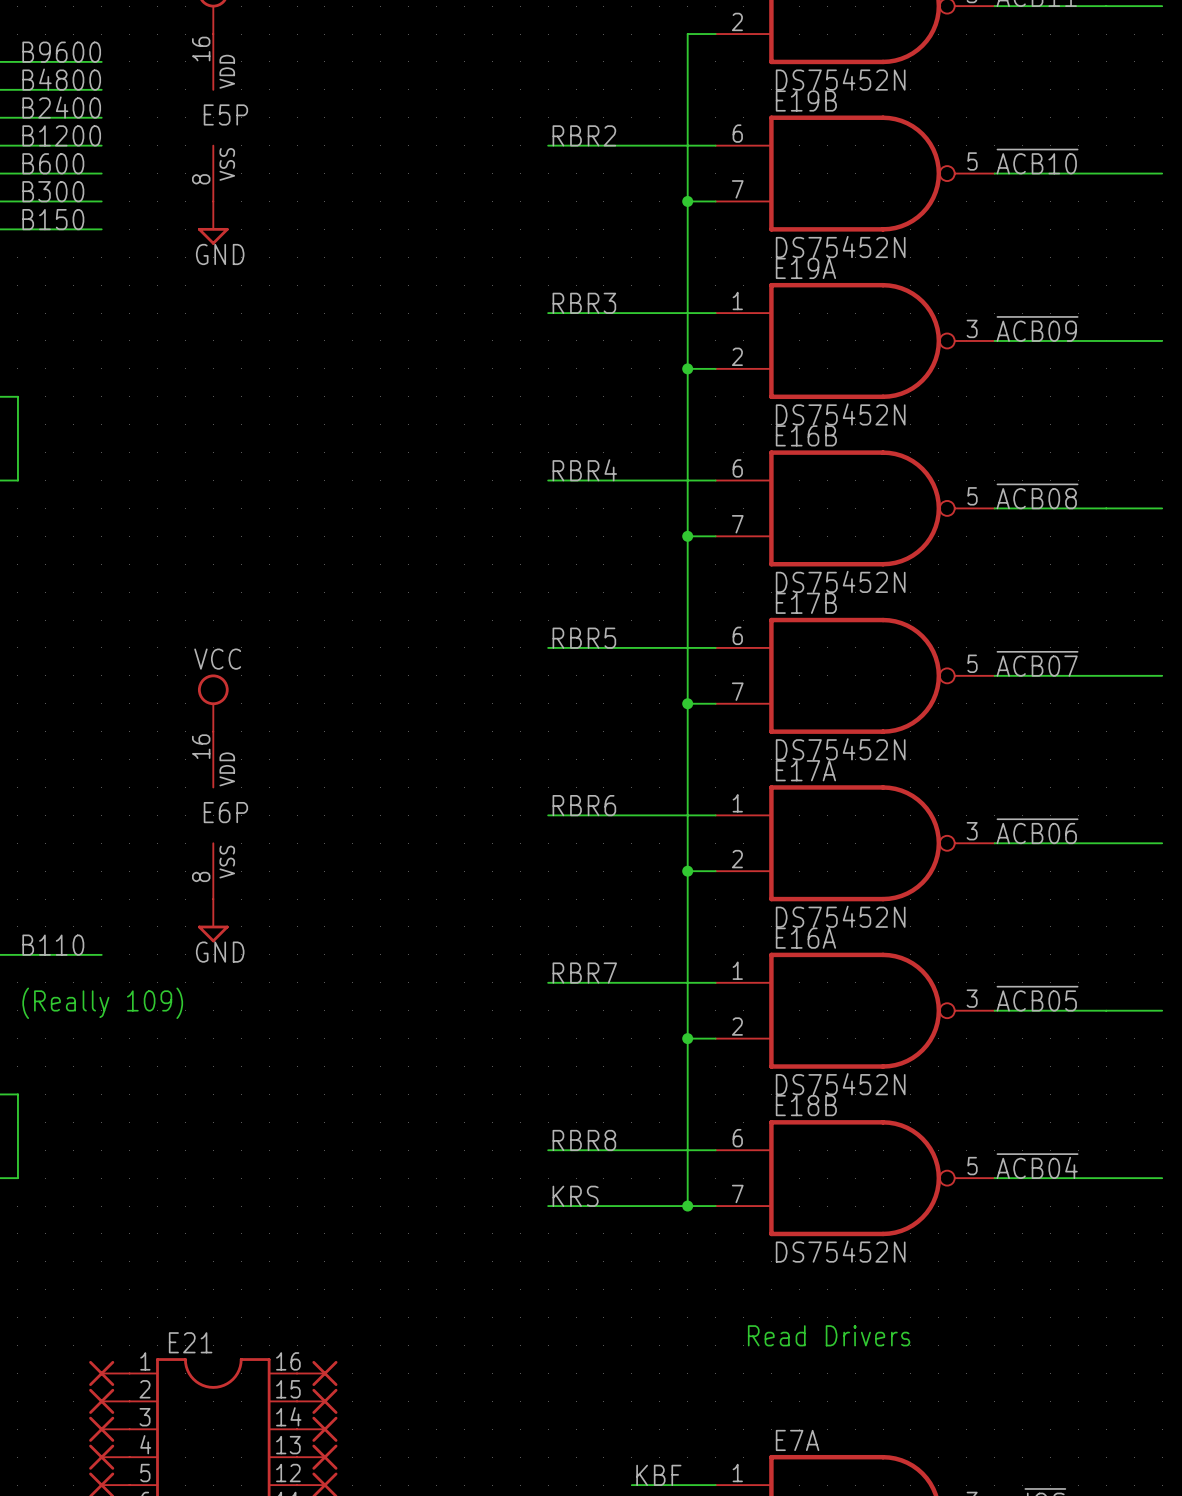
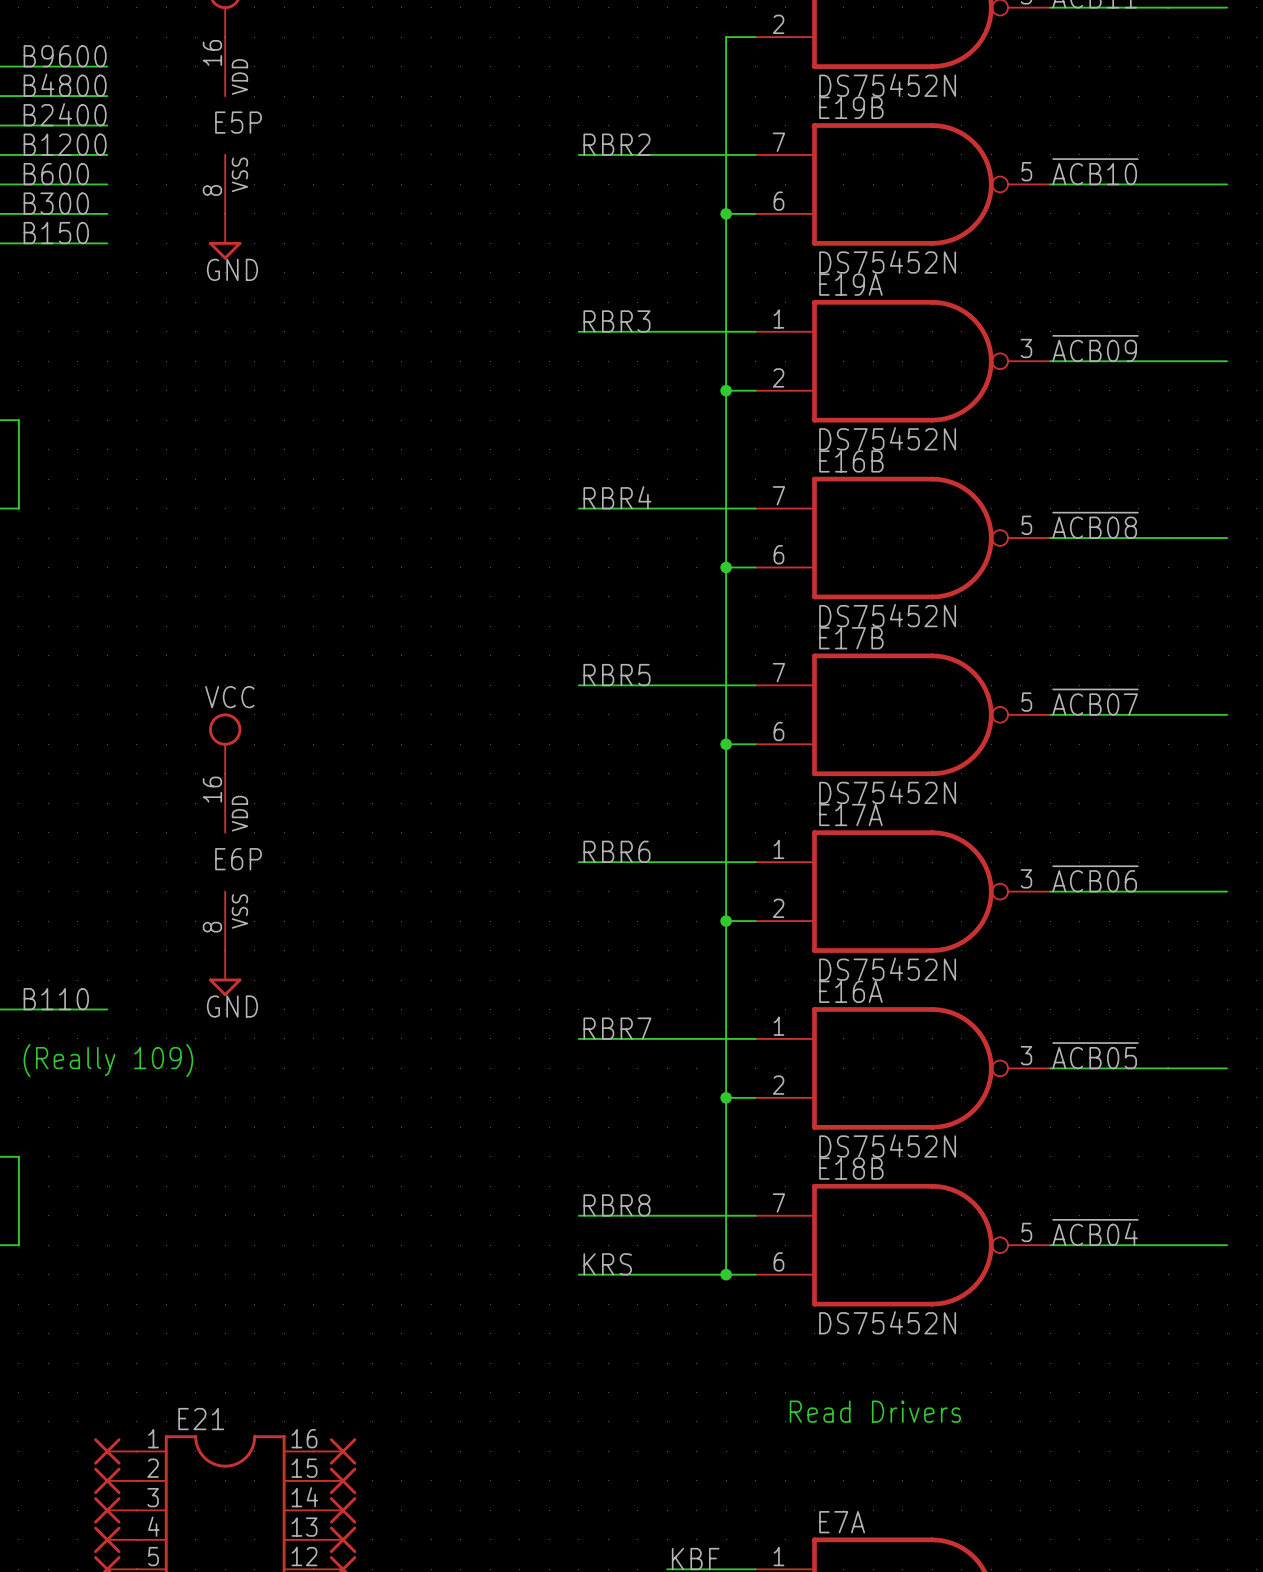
E19B flip: as is (855, 173) -> up-down (902, 184)
E16B flip: as is (855, 508) -> up-down (902, 538)
E17B flip: as is (855, 675) -> up-down (902, 714)
E18B flip: as is (855, 1178) -> up-down (902, 1245)

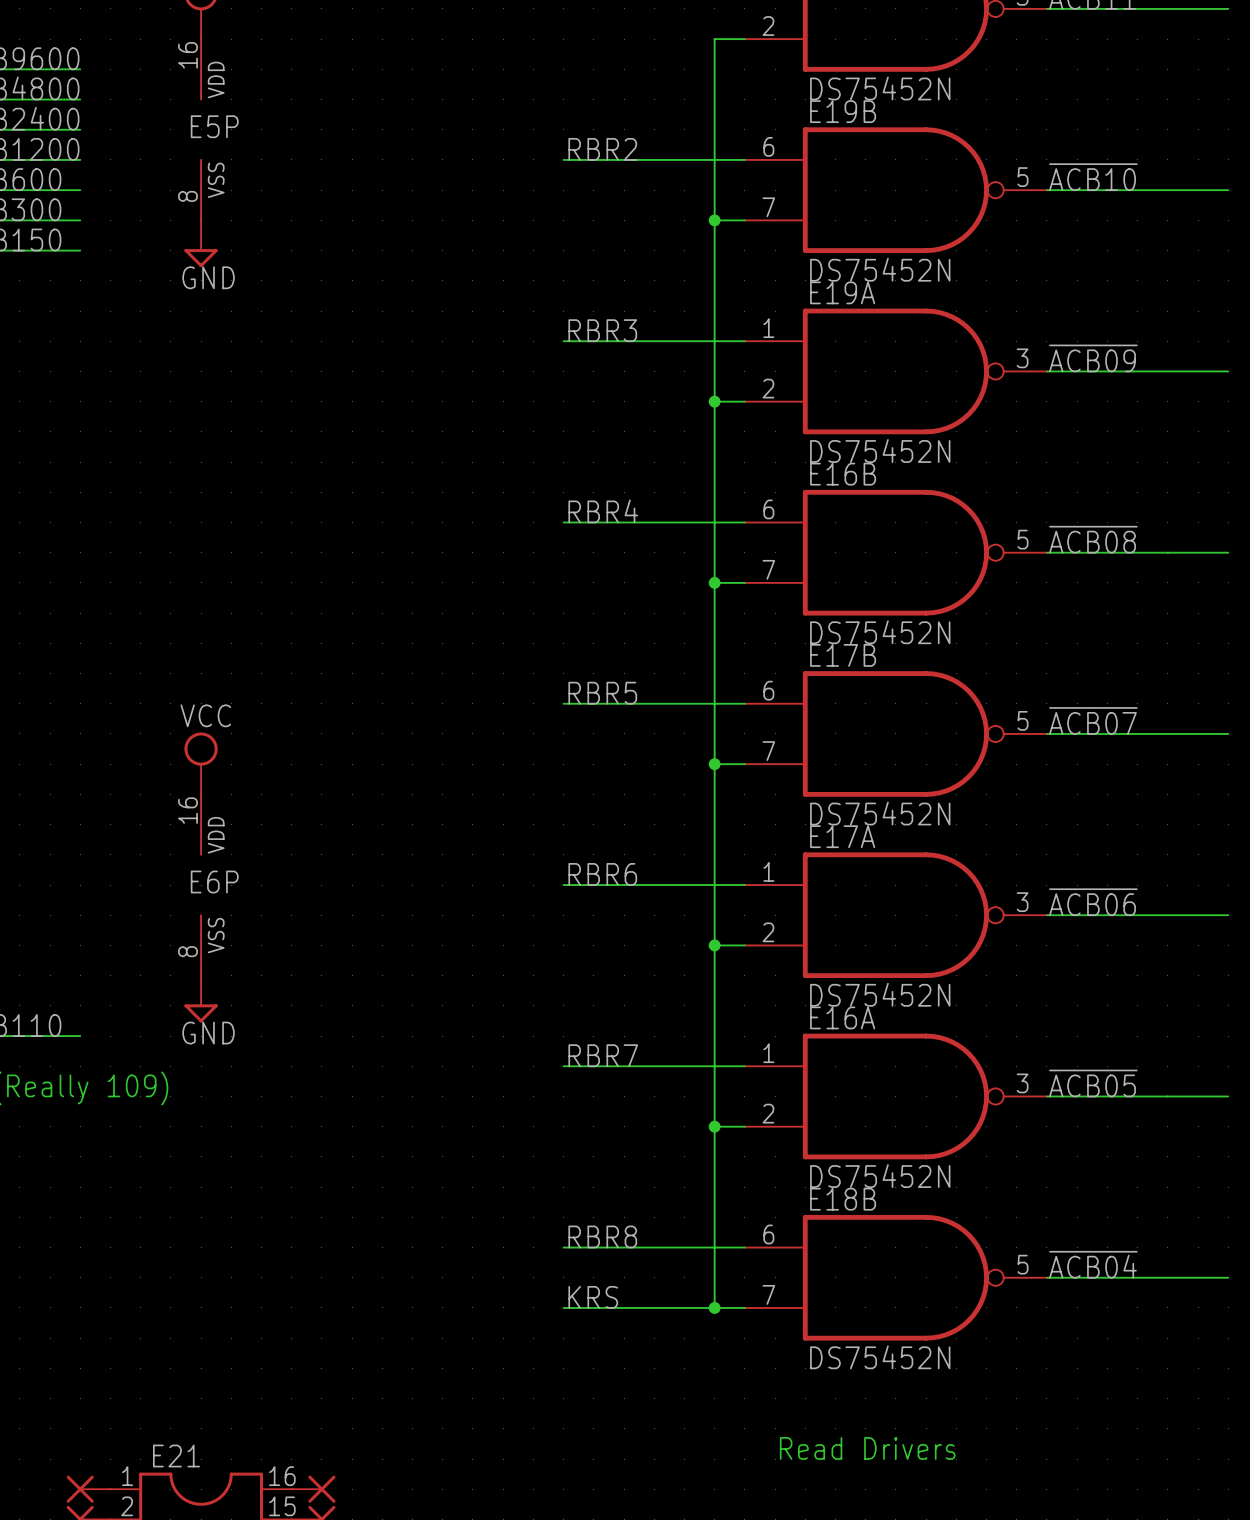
E19B flip: as is (902, 184) -> up-down (895, 190)
E16B flip: as is (902, 538) -> up-down (895, 552)
E17B flip: as is (902, 714) -> up-down (895, 733)
E18B flip: as is (902, 1245) -> up-down (895, 1277)

